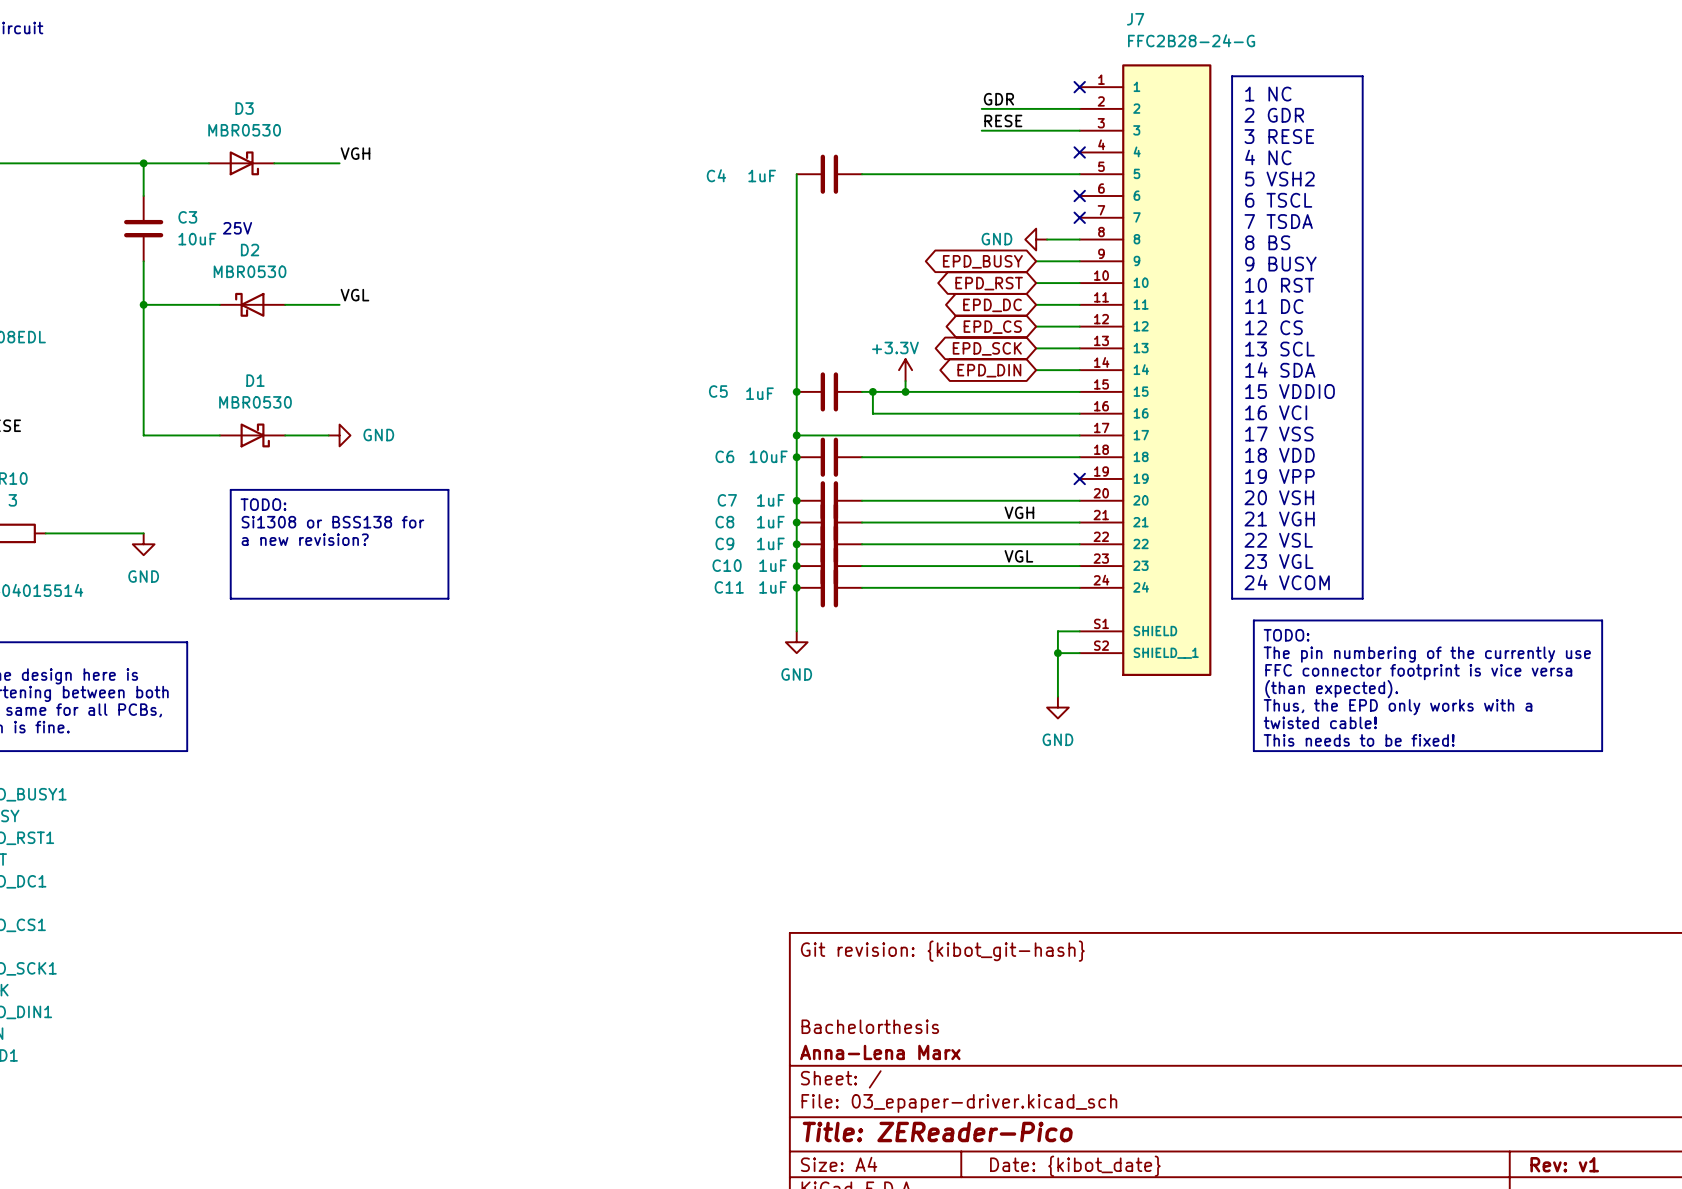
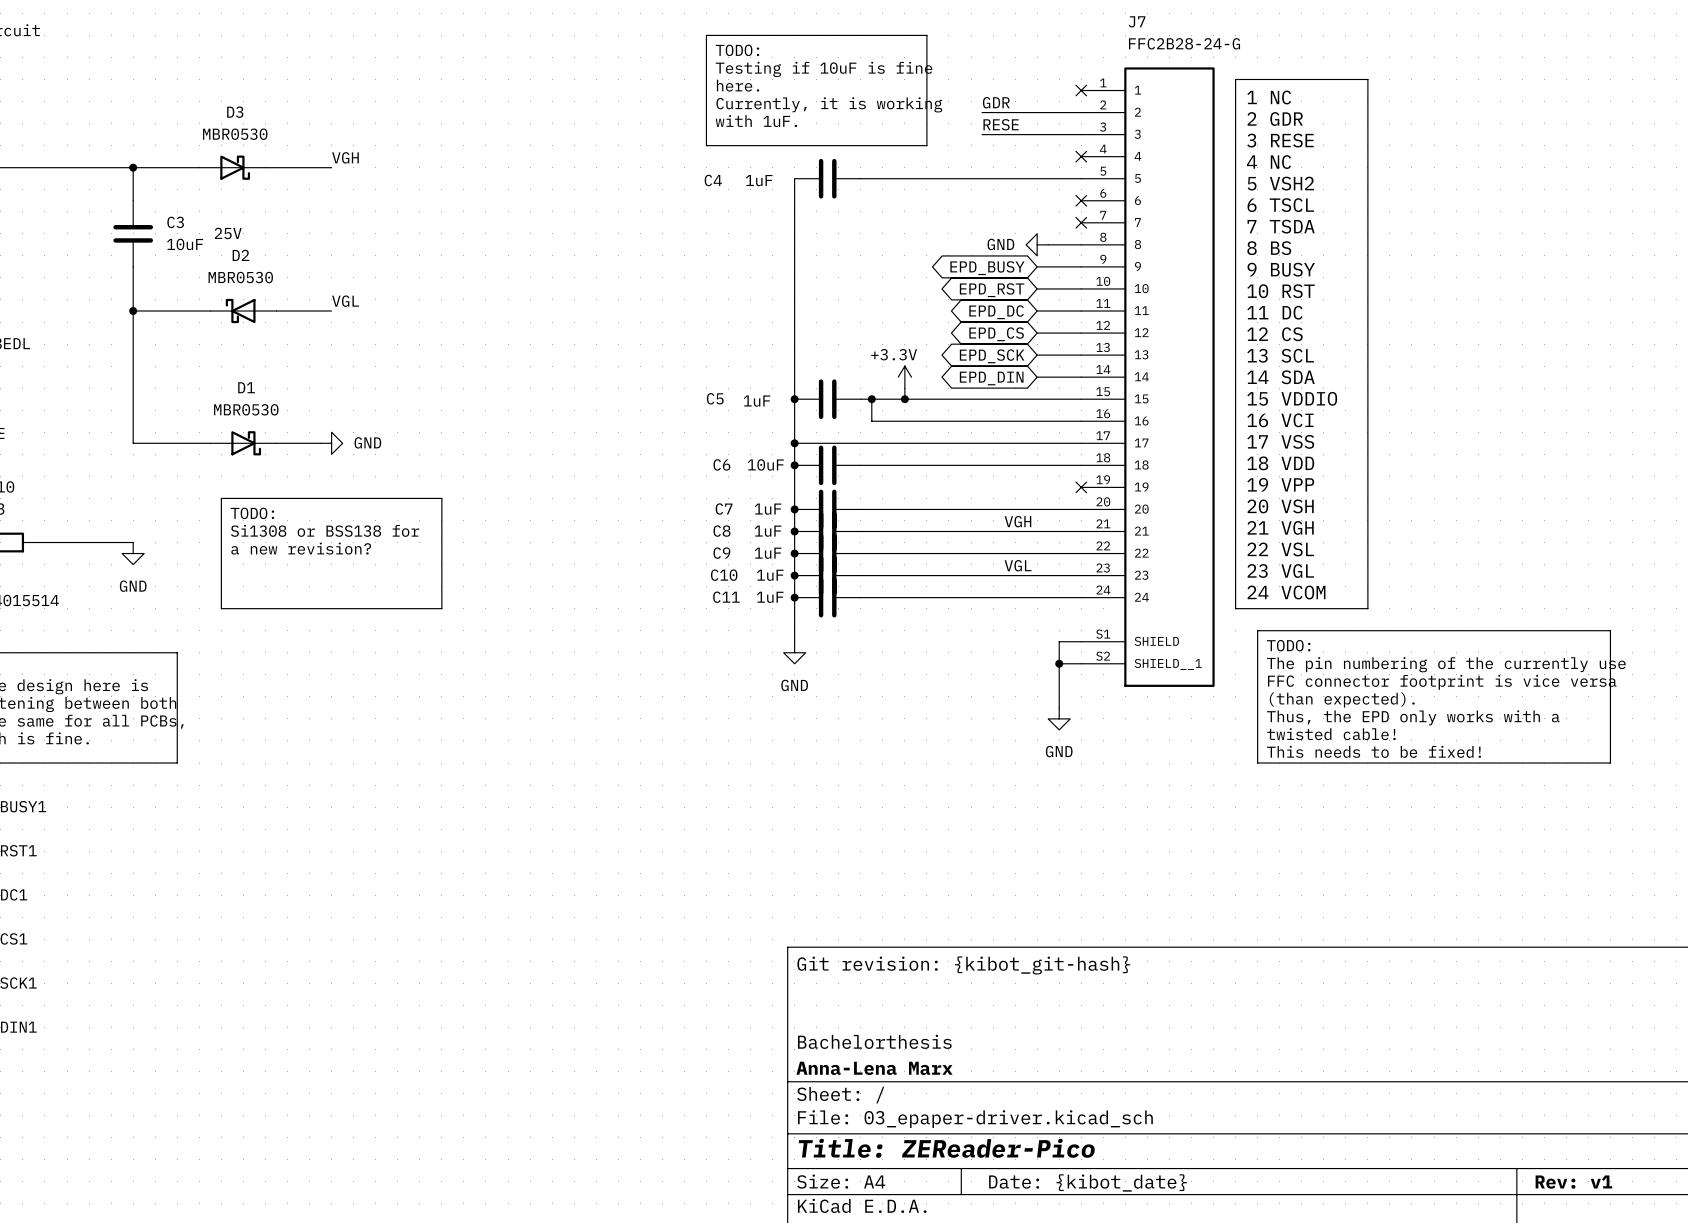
line: none -> (706, 35) (926, 35) (926, 145) (706, 145) (706, 35)
text: none -> TODO: (737, 50)
text: none -> Testing if 10uF is fine (824, 69)
text: none -> here. (738, 85)
text: none -> Currently, it is working (829, 104)
text: none -> with 1uF. (756, 121)

